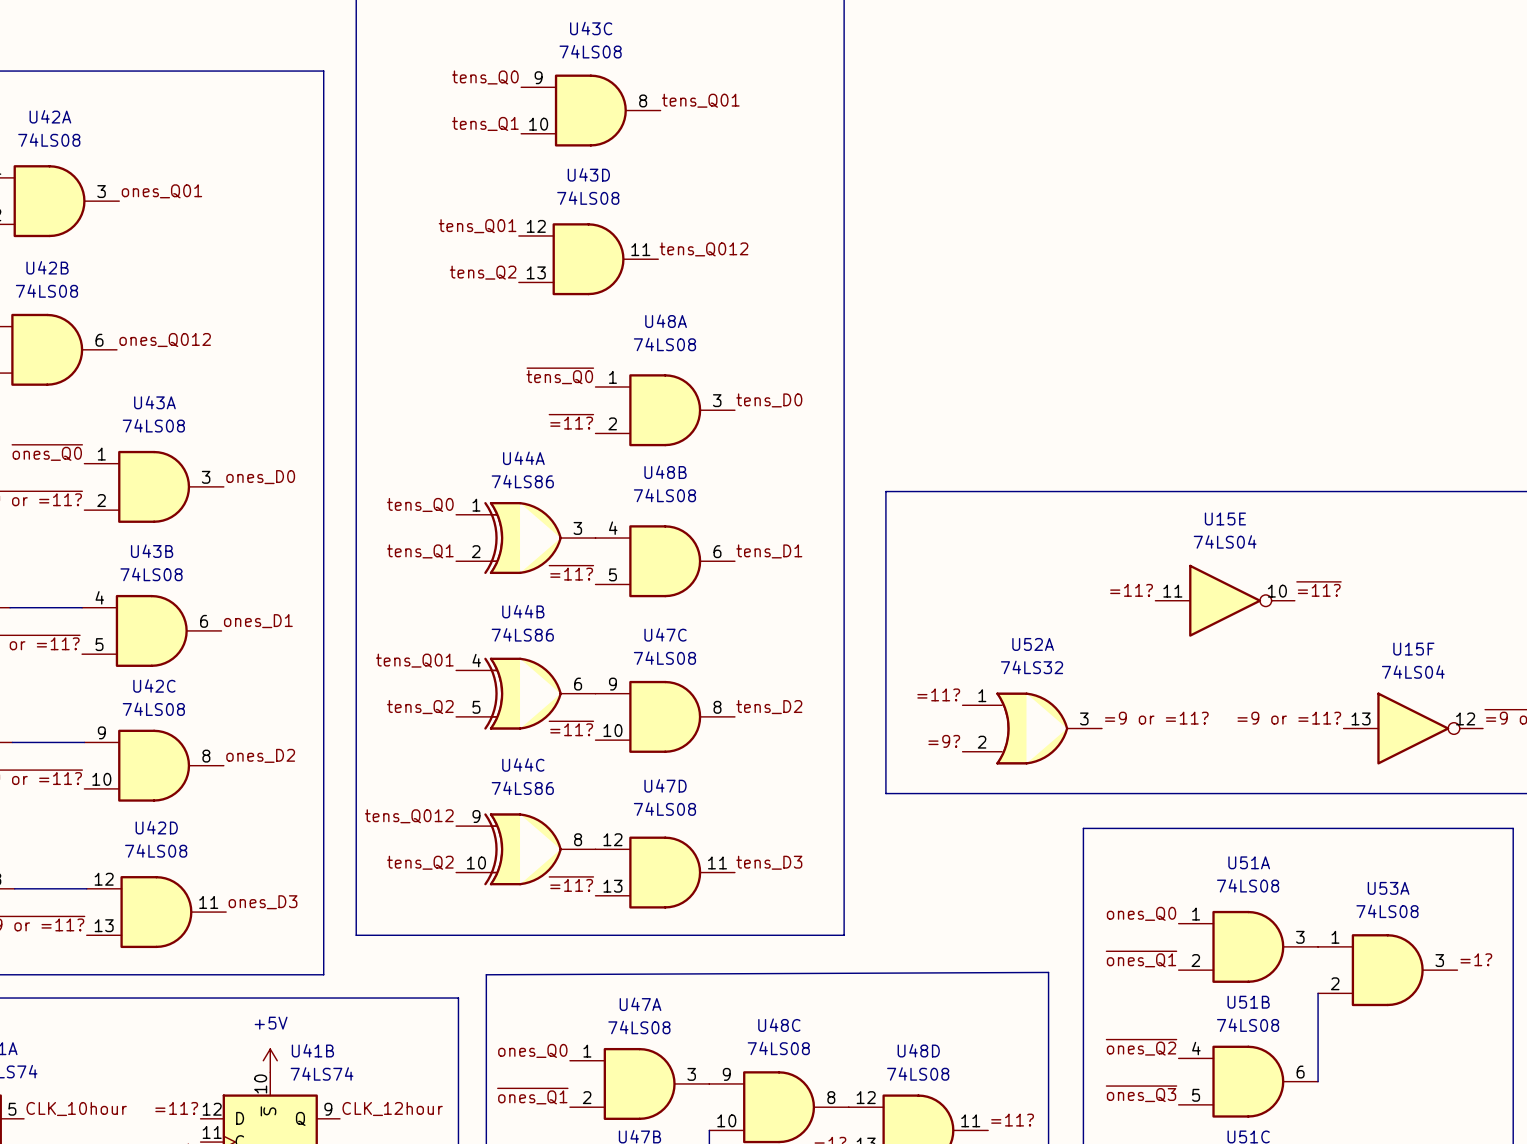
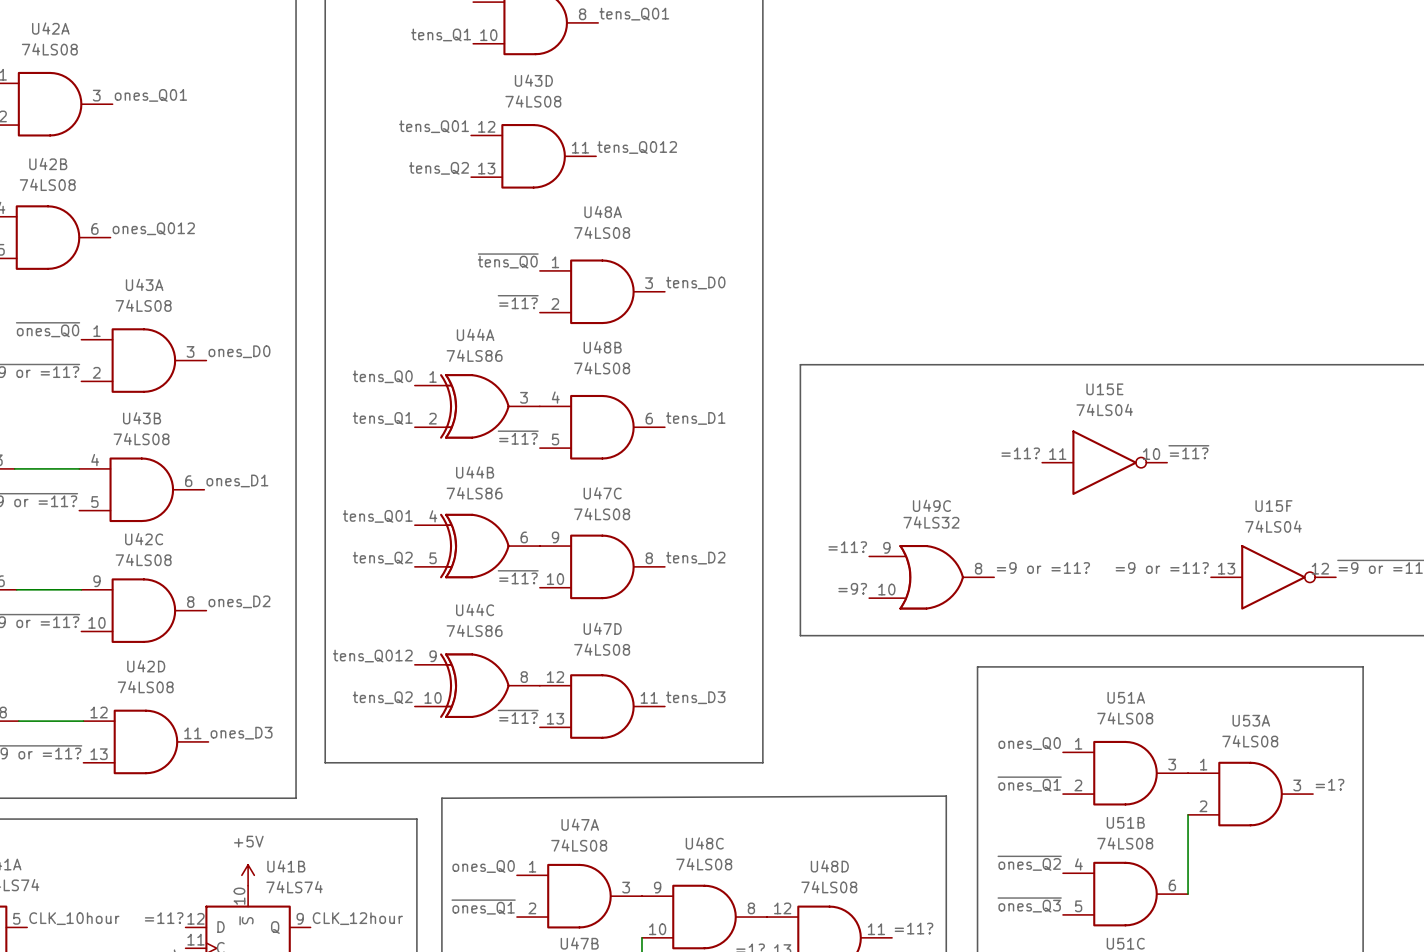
U52A name: U52A (1033, 644) -> U49C (931, 505)
U52A pin number: 1 (982, 695) -> 9 (886, 547)
U52A pin number: 3 (1084, 718) -> 8 (978, 568)
U52A pin number: 2 (982, 742) -> 10 (886, 589)

